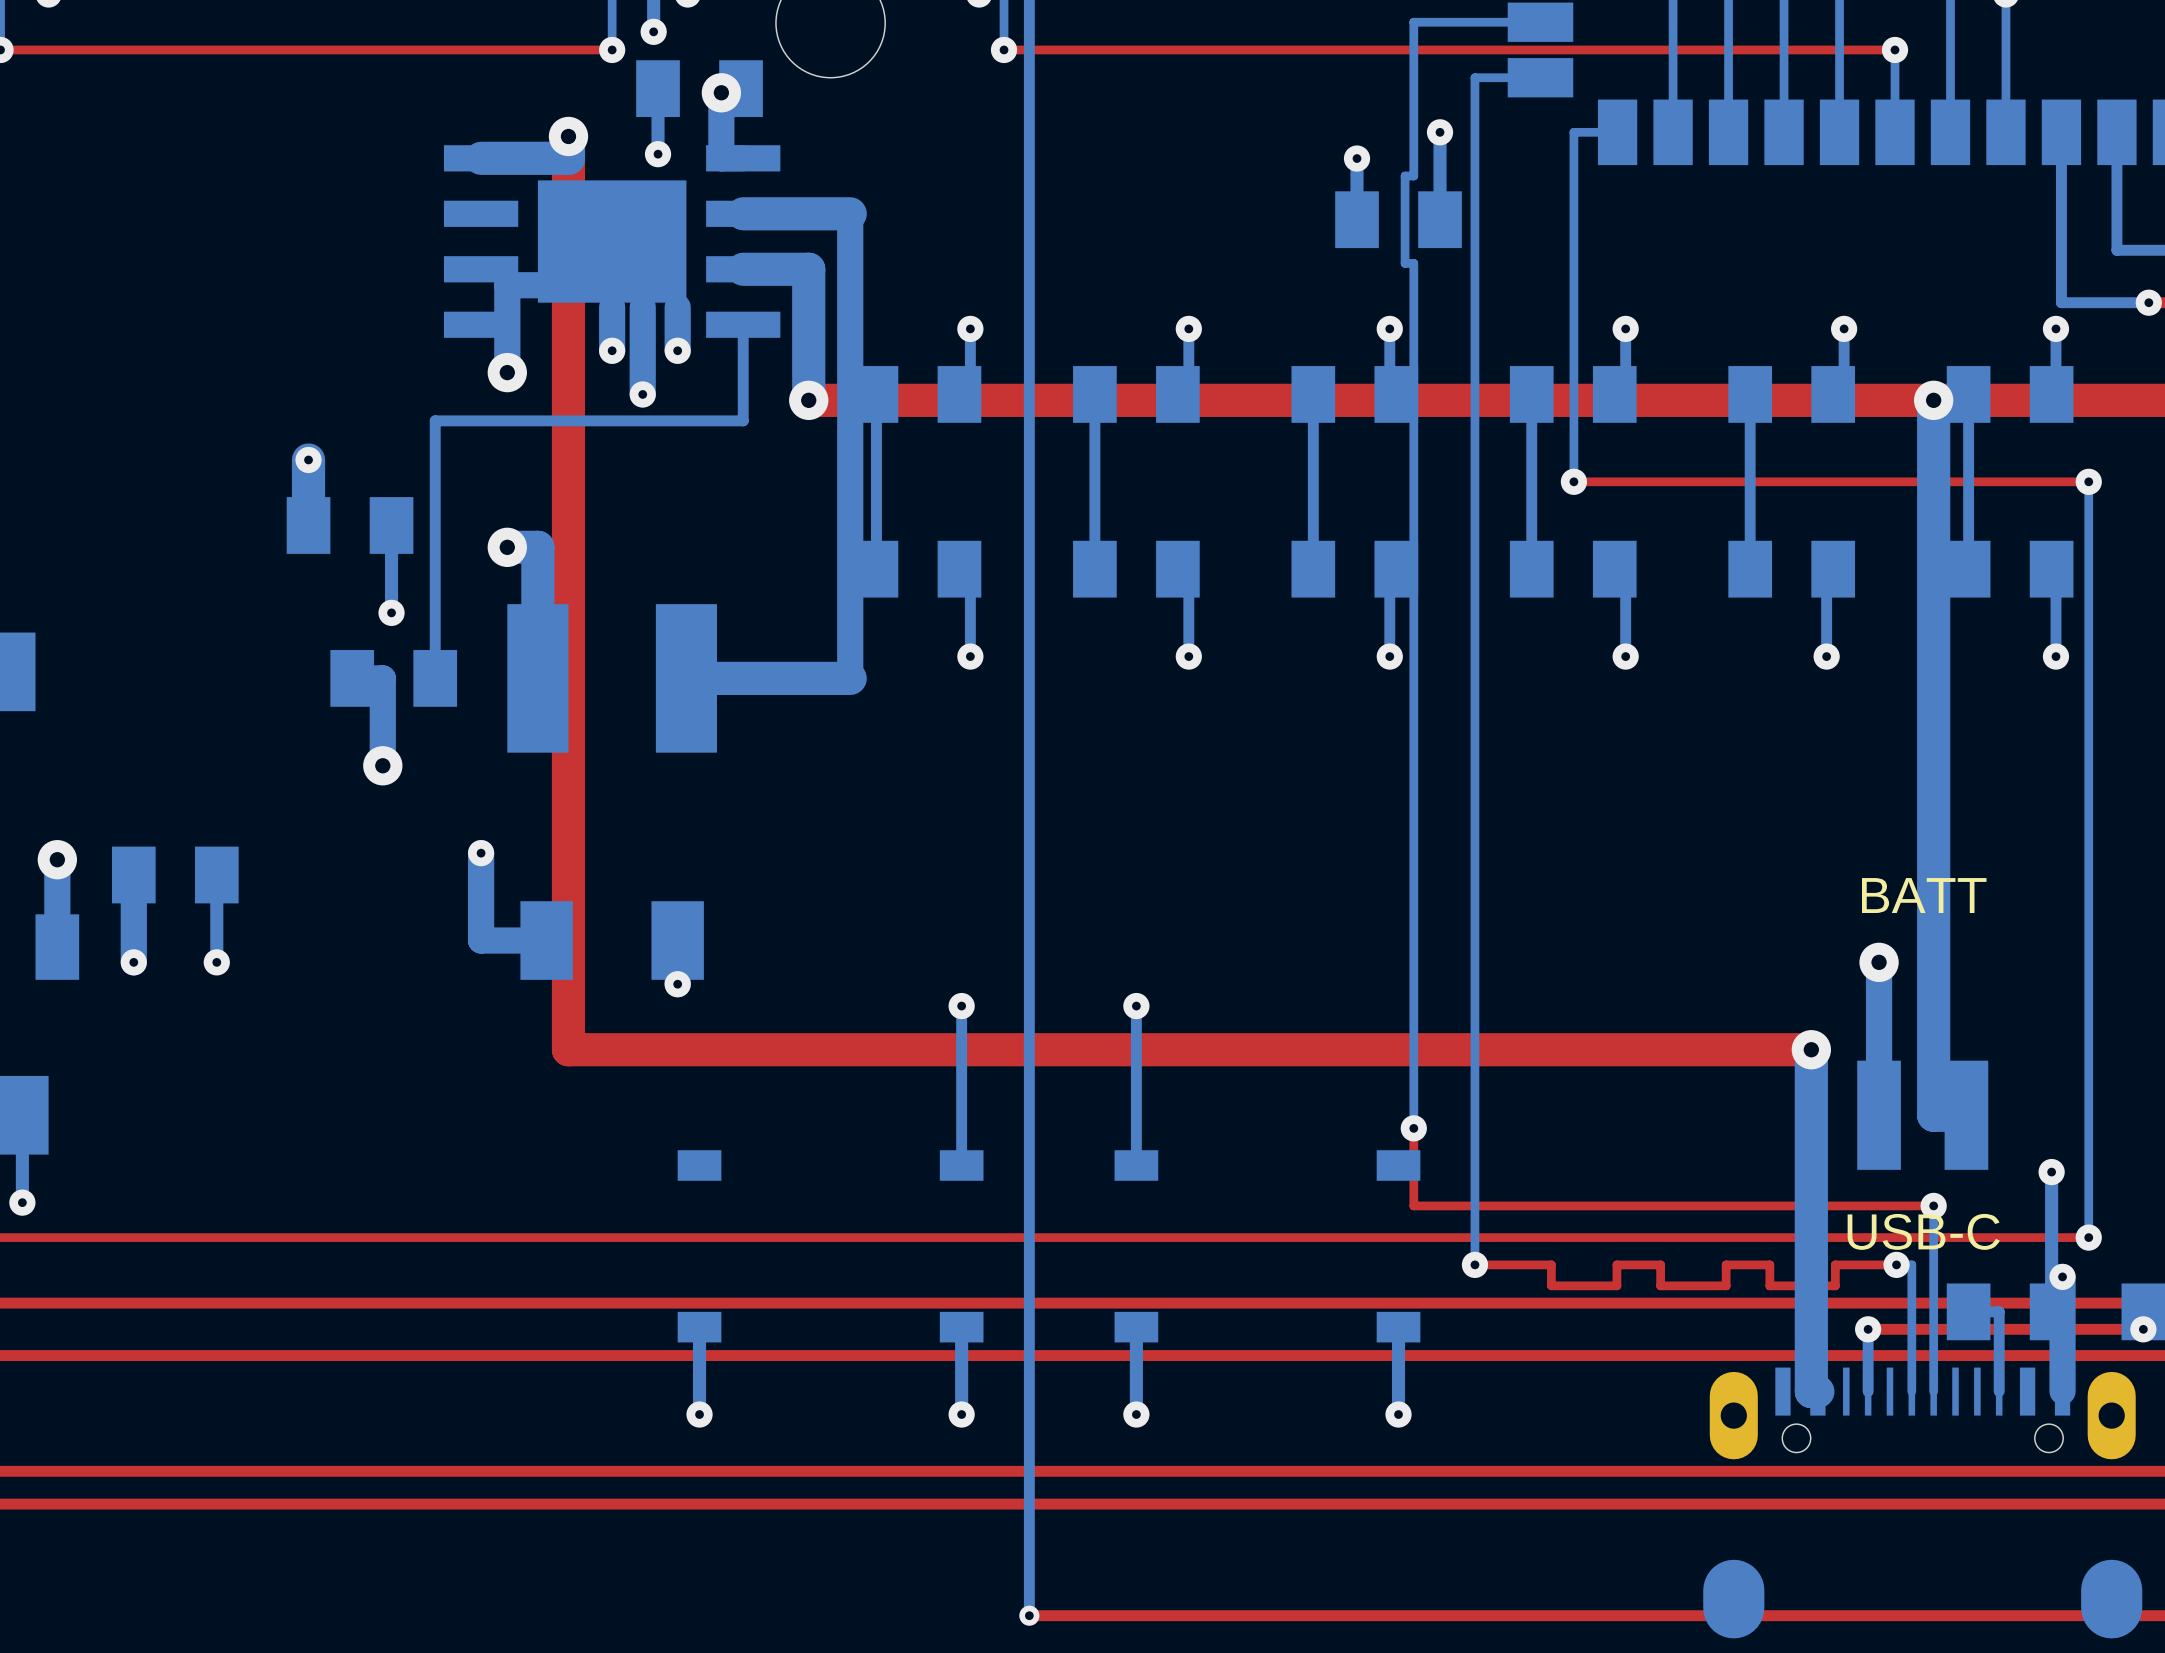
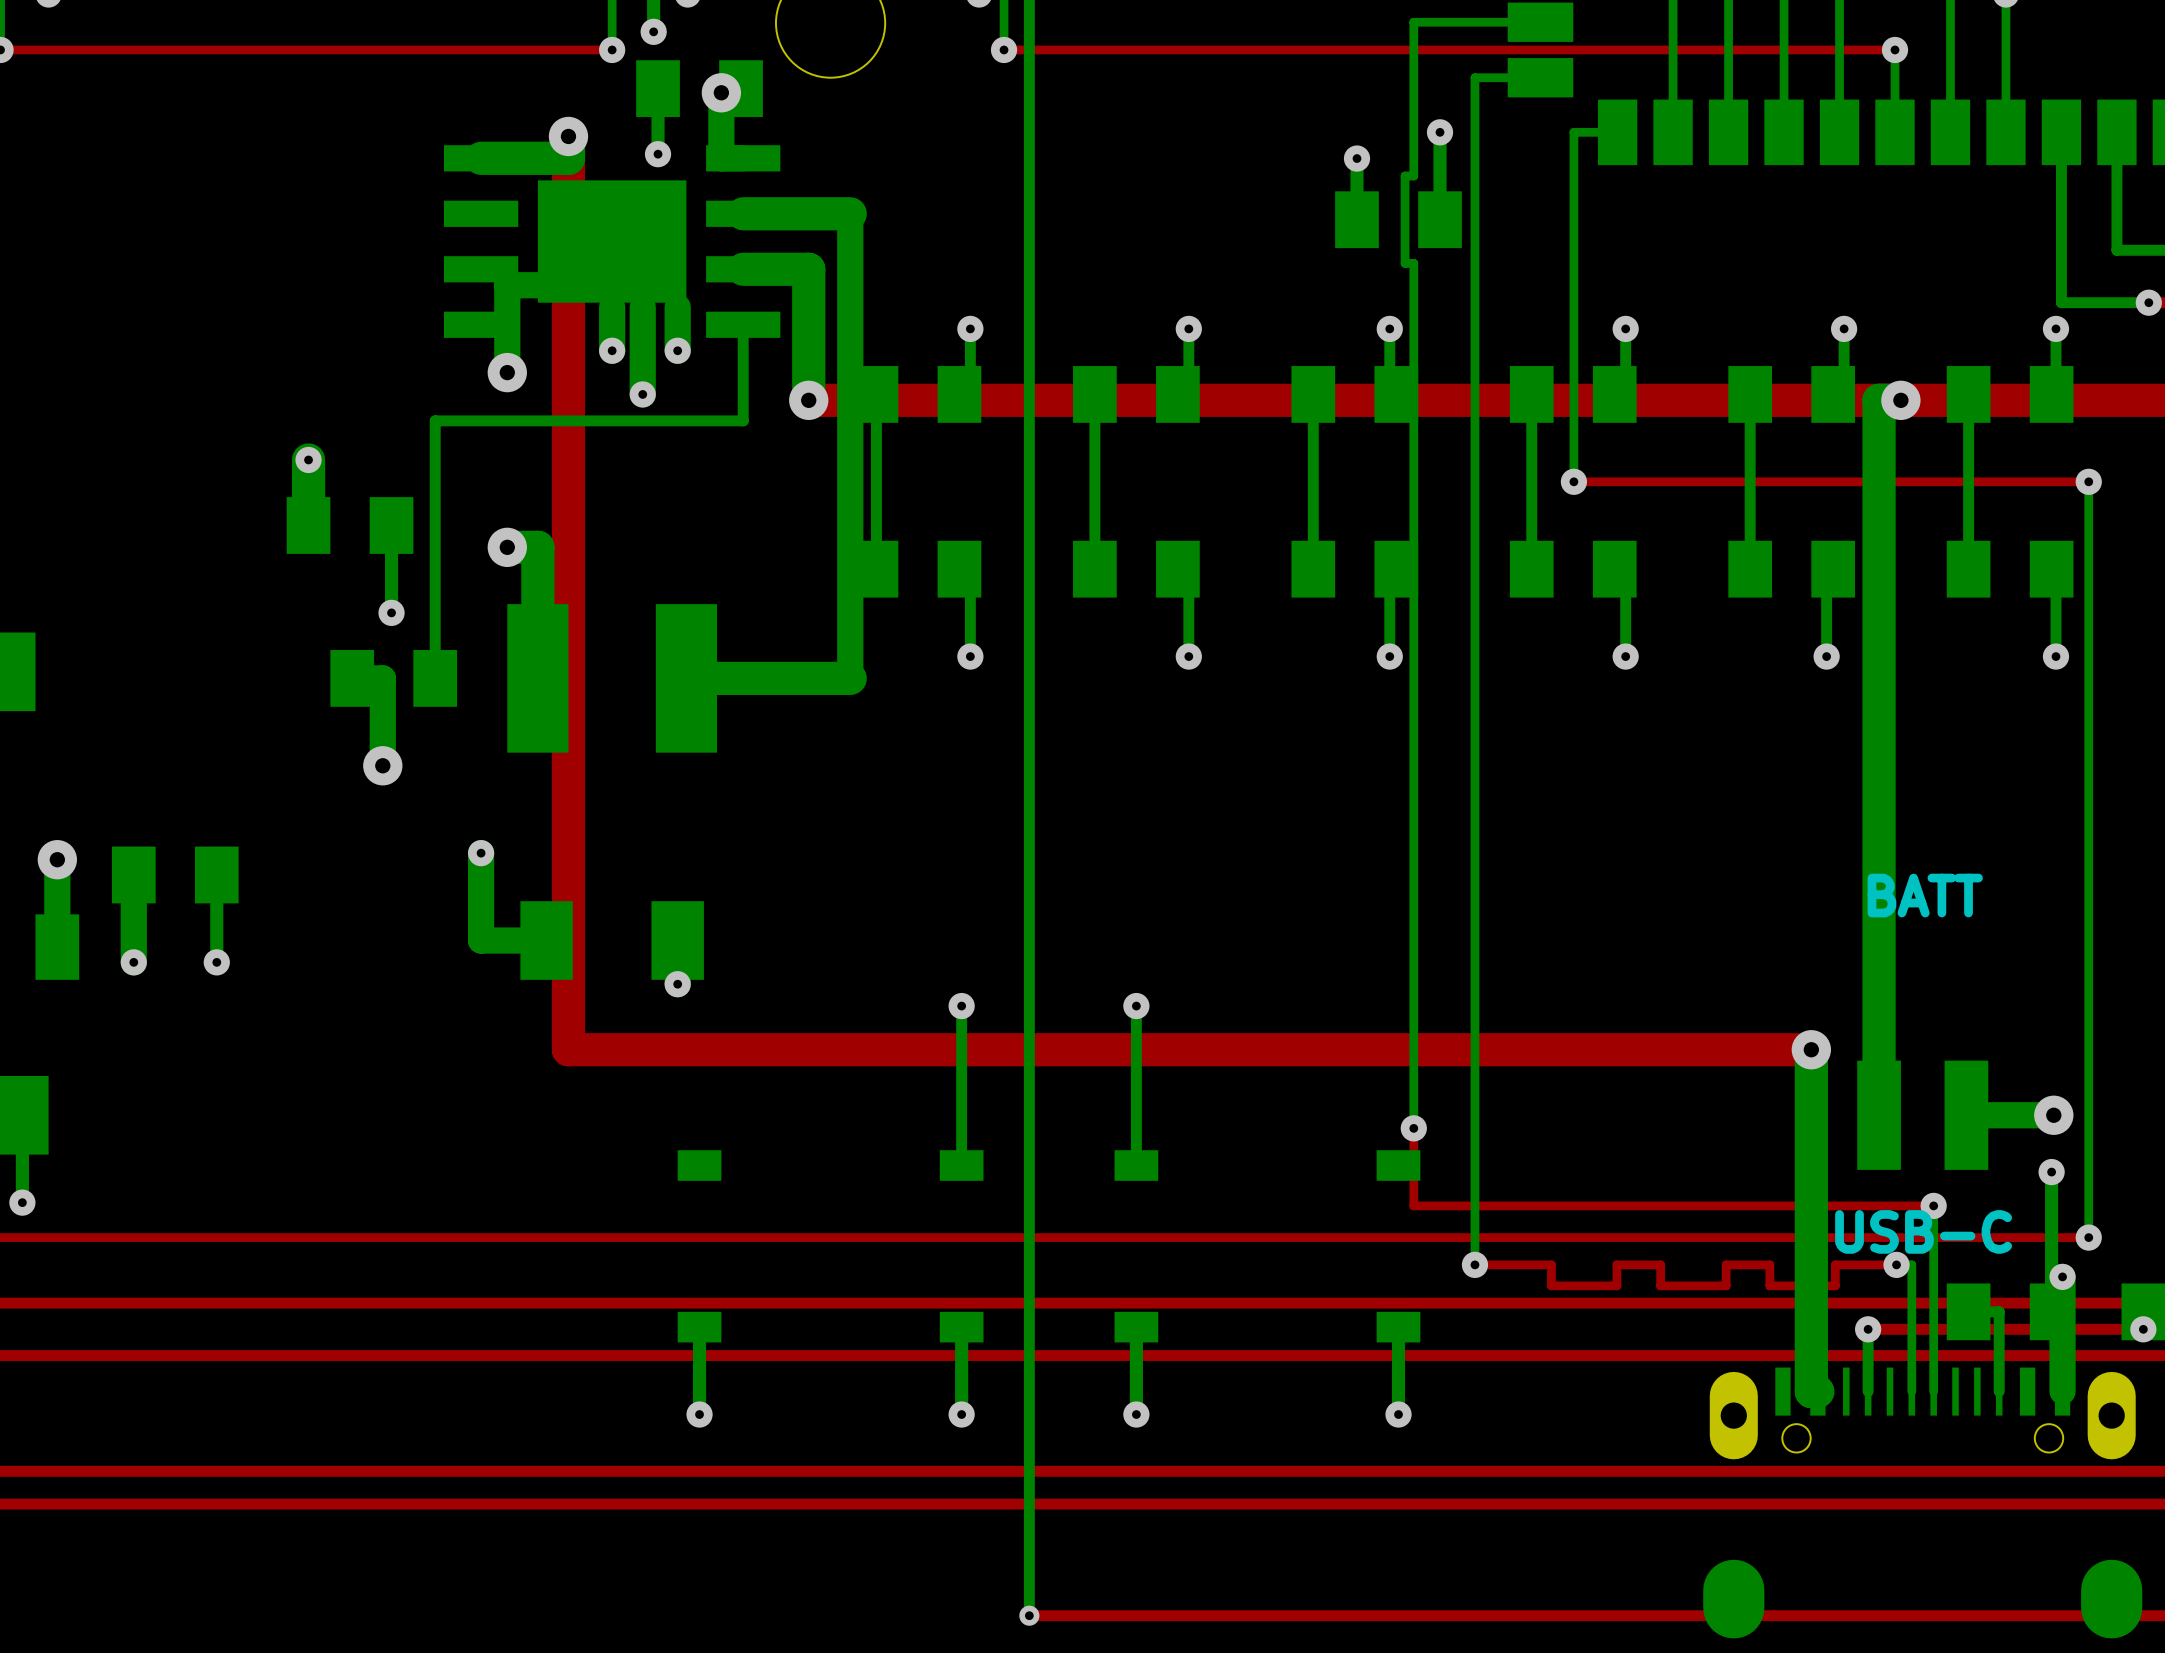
bottom track: none -> (1900, 400) (1879, 400) (1879, 962)
bottom track: (1933, 400) (1933, 1115) (1966, 1115) -> (2053, 1115) (1966, 1115)
via position: (1933, 400) -> (1900, 400)
bottom track width: thin (1879, 962) (1879, 1115) -> thick (1879, 962) (1879, 1115)
via position: (1879, 962) -> (2053, 1115)

